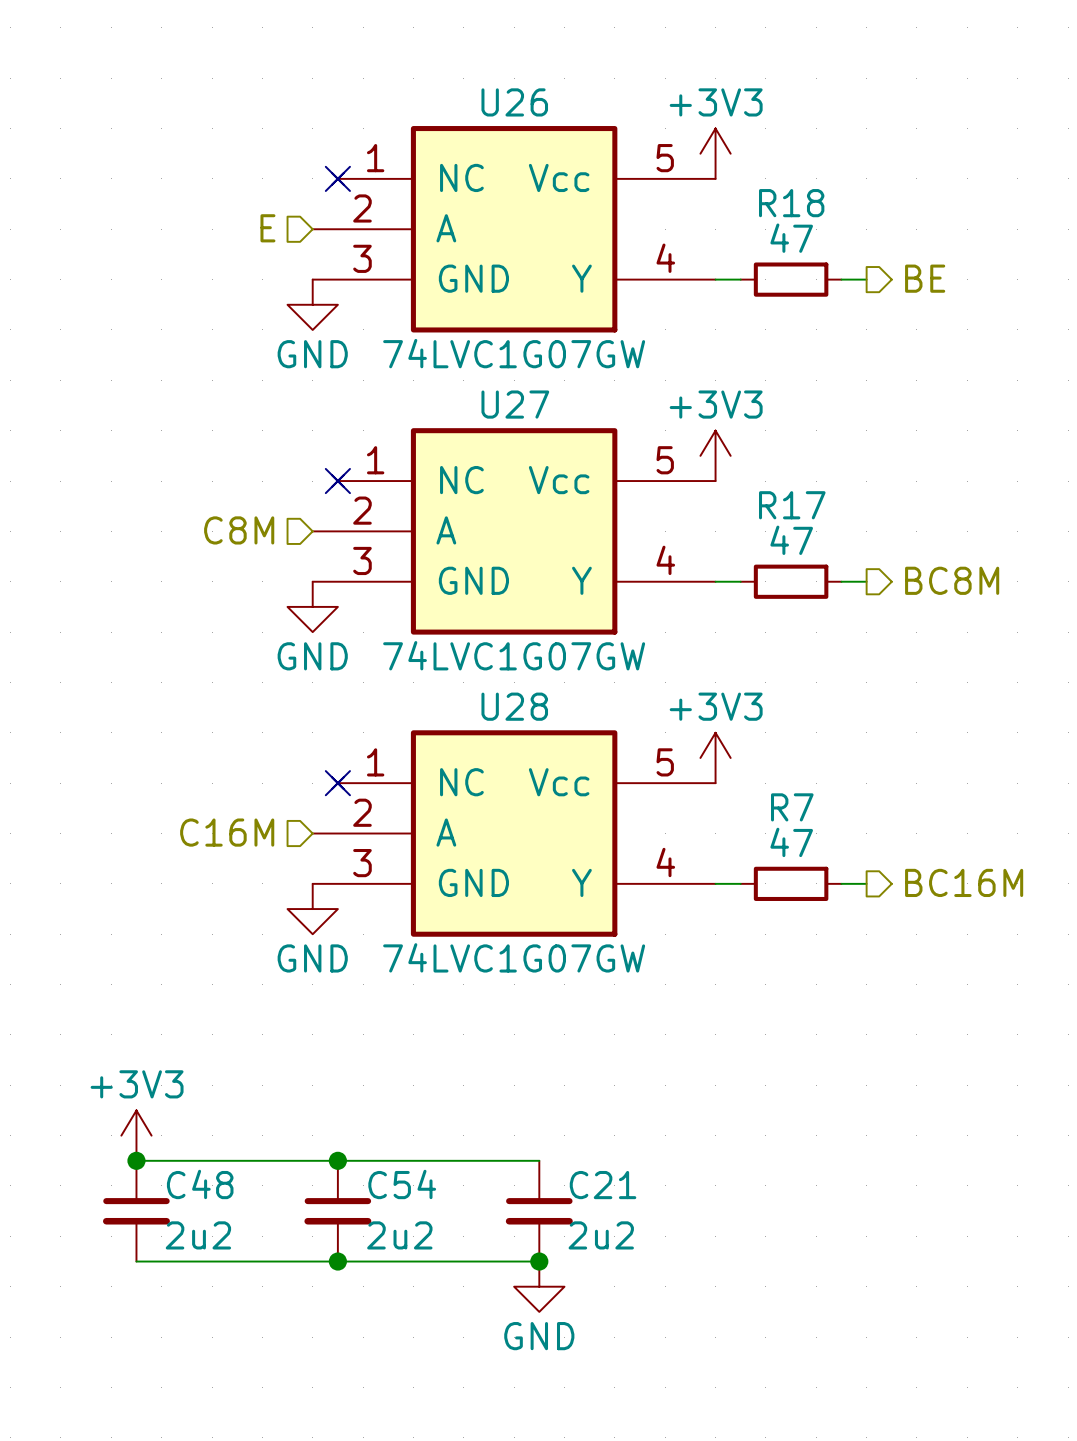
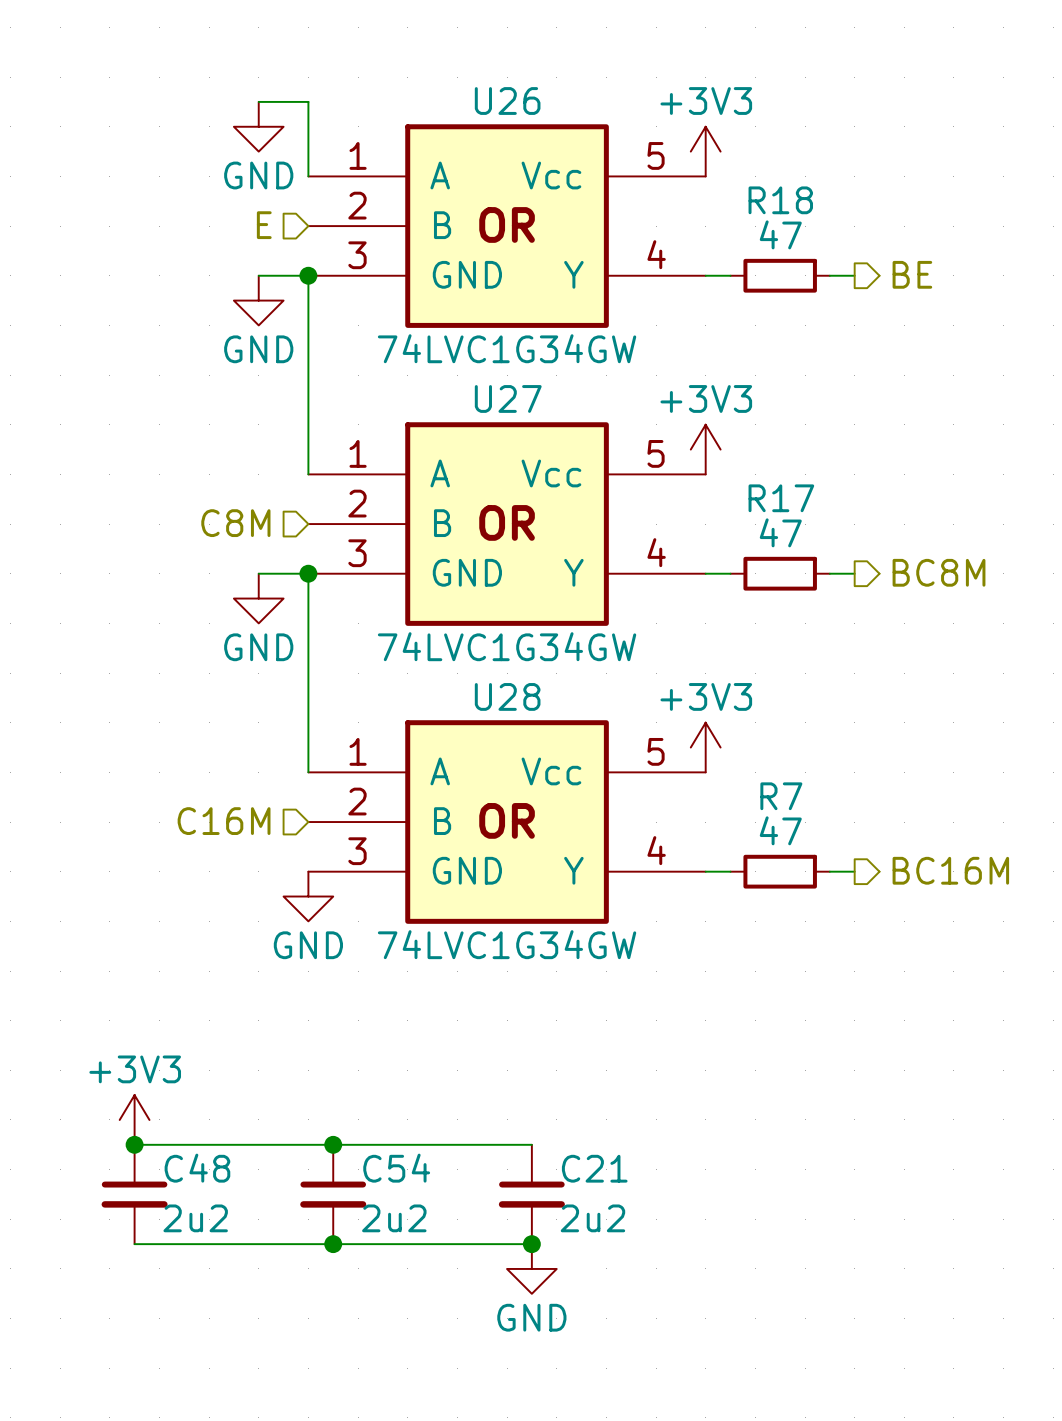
wire: none -> (258, 101) (308, 101) (308, 176)
U26 symbol: [312, 126, 716, 333] -> [308, 124, 706, 328]
power symbol: none -> GND (258, 126)
no-connect mark: (337, 178) -> none
wire: none -> (258, 275) (308, 275) (308, 474)
junction: none -> (308, 275)
power symbol position: GND (312, 304) -> GND (258, 300)
U26 value: 74LVC1G07GW (514, 353) -> 74LVC1G34GW (507, 348)
U27 symbol: [312, 428, 716, 635] -> [308, 422, 706, 626]
no-connect mark: (337, 481) -> none
wire: none -> (258, 573) (308, 573) (308, 772)
junction: none -> (308, 573)
power symbol position: GND (312, 606) -> GND (258, 598)
U27 value: 74LVC1G07GW (514, 655) -> 74LVC1G34GW (507, 646)
U28 symbol: [312, 730, 716, 937] -> [308, 720, 706, 924]
no-connect mark: (337, 783) -> none
U28 value: 74LVC1G07GW (514, 957) -> 74LVC1G34GW (507, 944)

